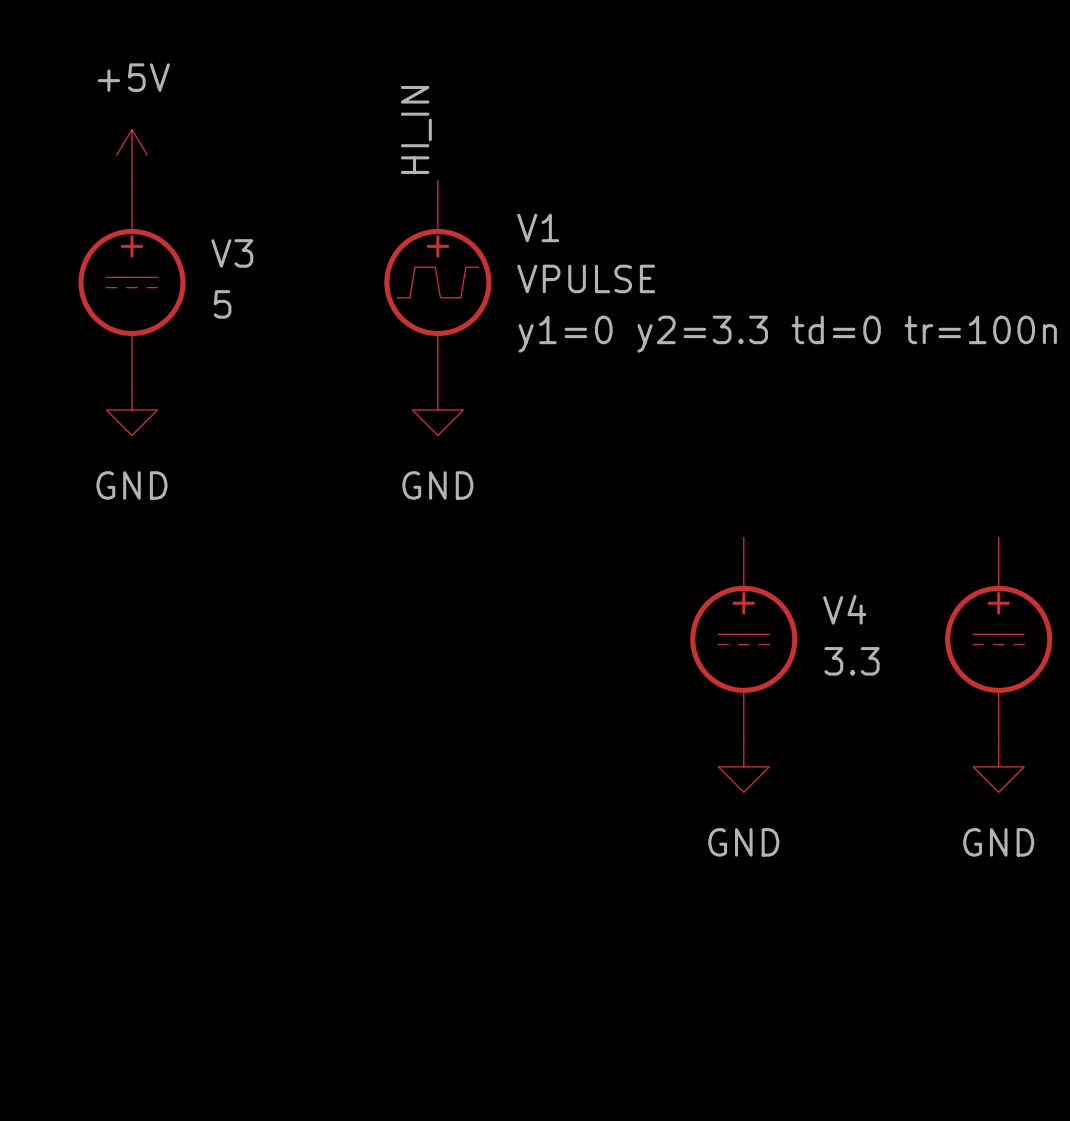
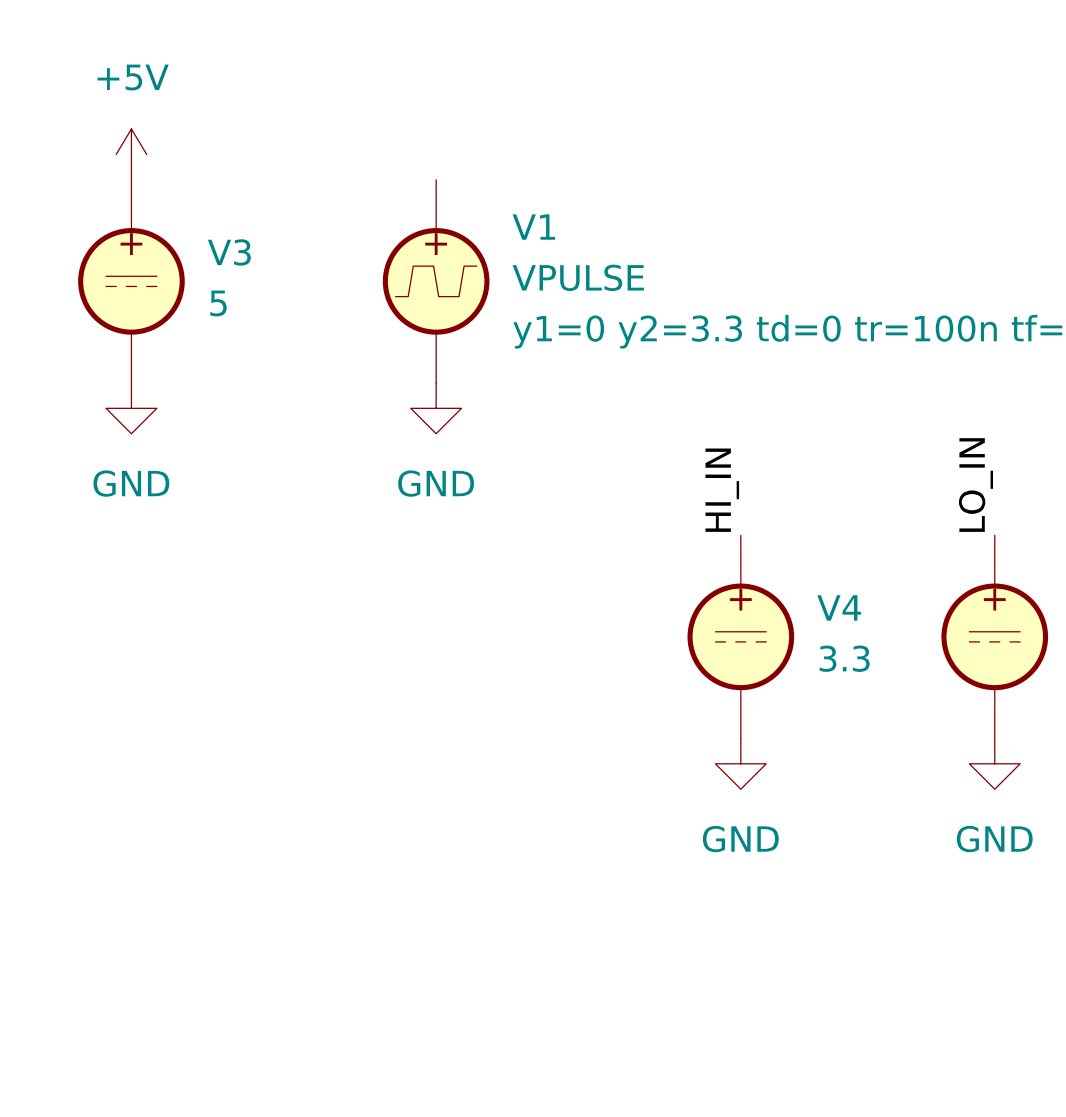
label position: HI_IN (416, 129) -> HI_IN (722, 490)
label: none -> LO_IN (975, 485)

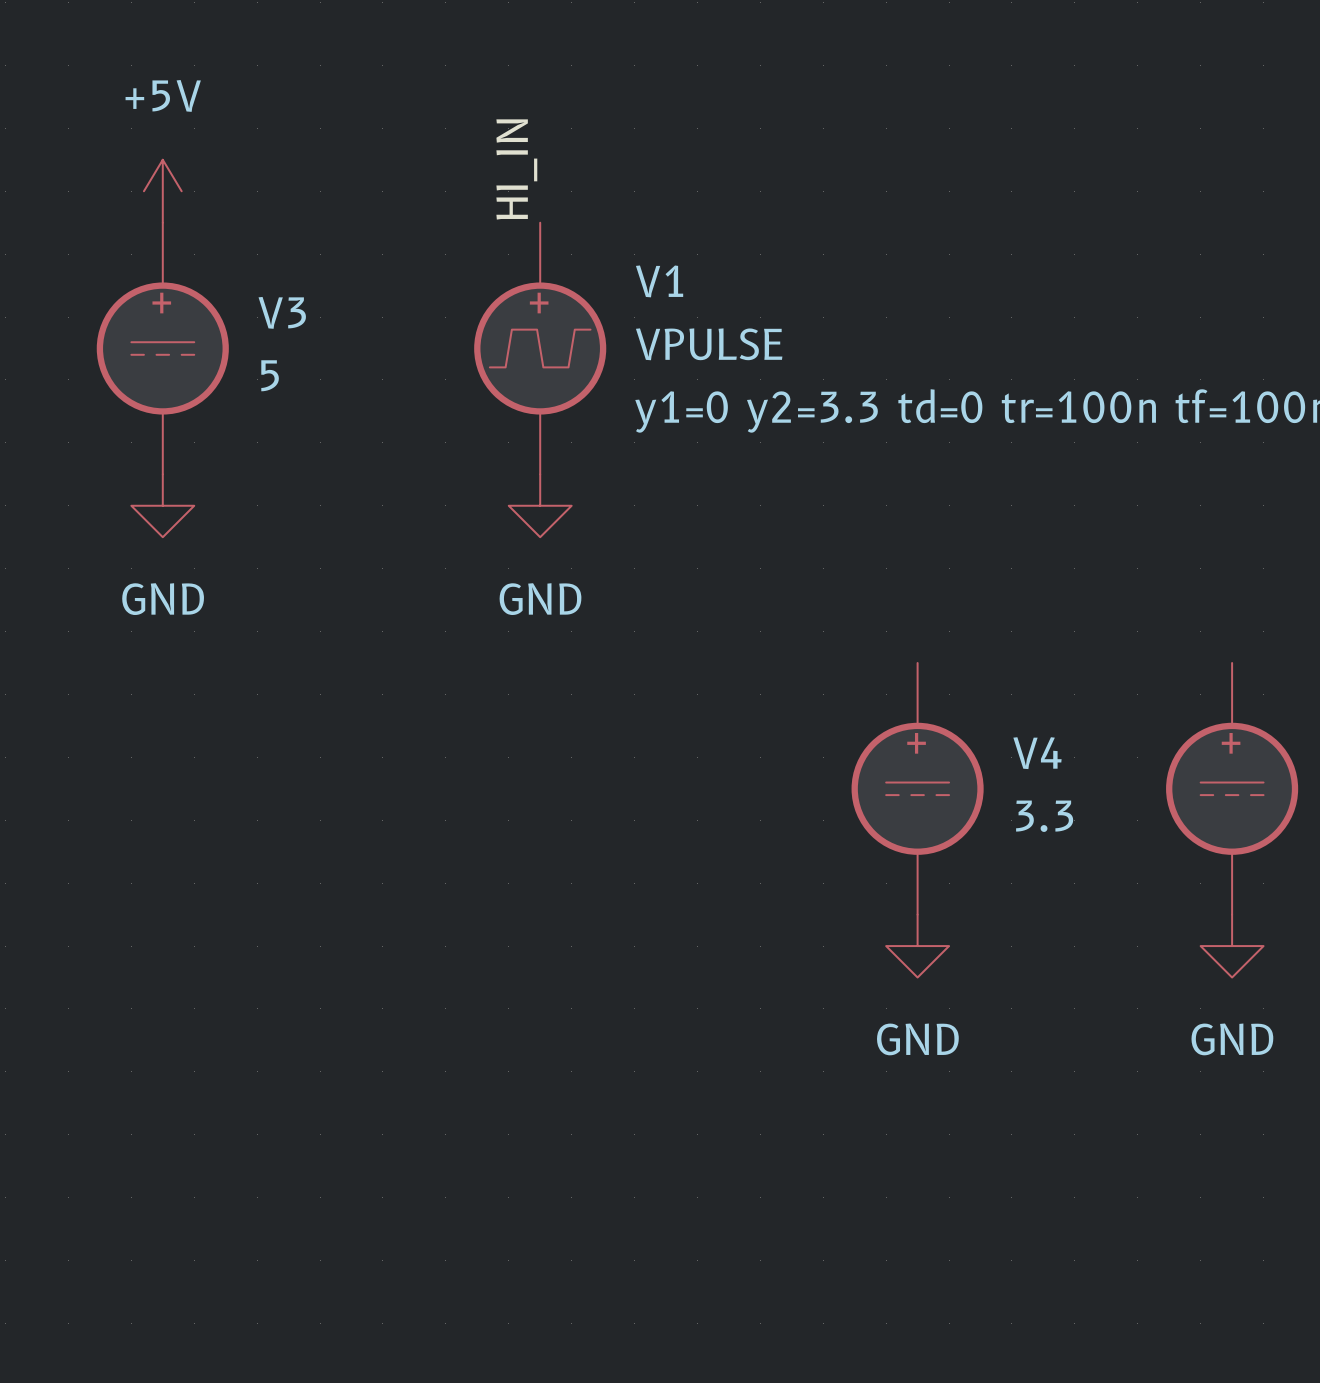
label: LO_IN (975, 485) -> none
label position: HI_IN (722, 490) -> HI_IN (516, 169)

